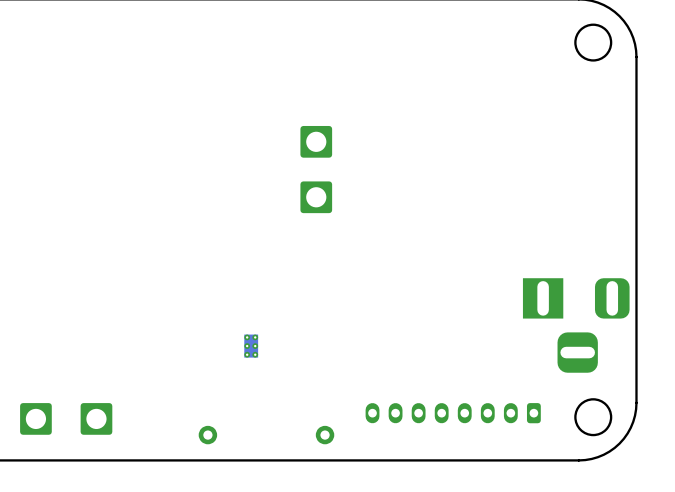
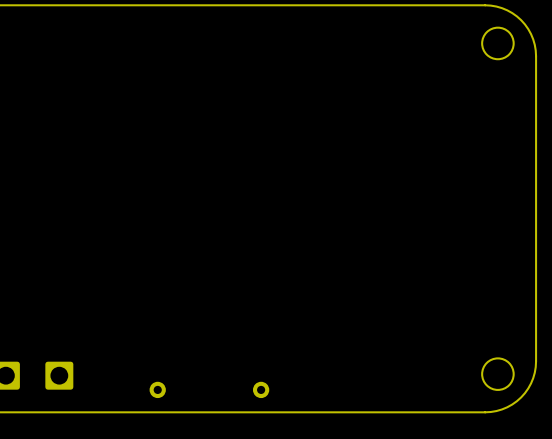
part: (316, 141) -> none
part: (316, 197) -> none
part: (576, 325) -> none
part: (251, 346) -> none
part: (453, 413) -> none

